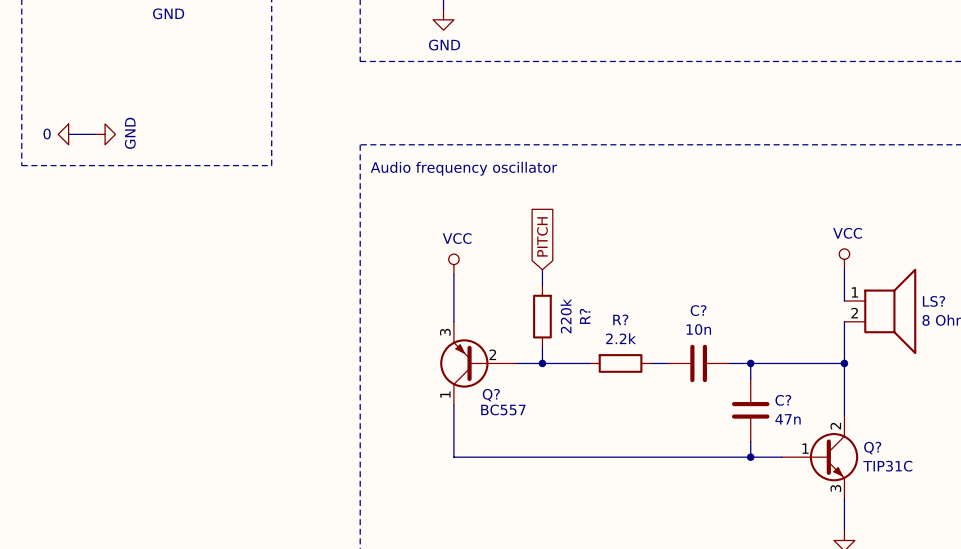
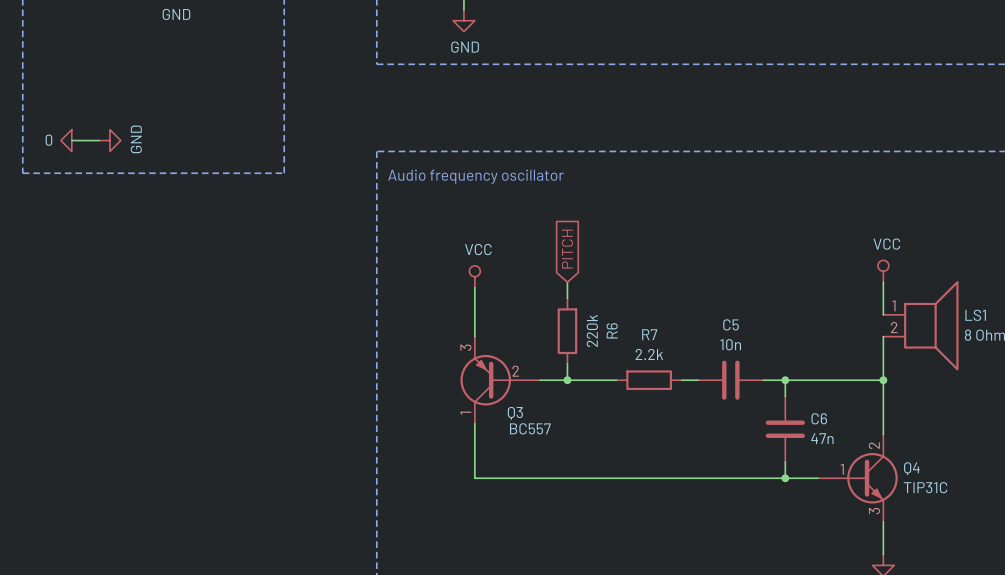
LS? name: LS? (934, 301) -> LS1 (975, 315)
C? name: C? (698, 310) -> C5 (731, 324)
R? name: R? (585, 316) -> R6 (612, 330)
R? name: R? (620, 319) -> R7 (649, 334)
Q? name: Q? (491, 395) -> Q3 (515, 413)
C? name: C? (783, 400) -> C6 (819, 418)
Q? name: Q? (872, 448) -> Q4 (911, 468)

